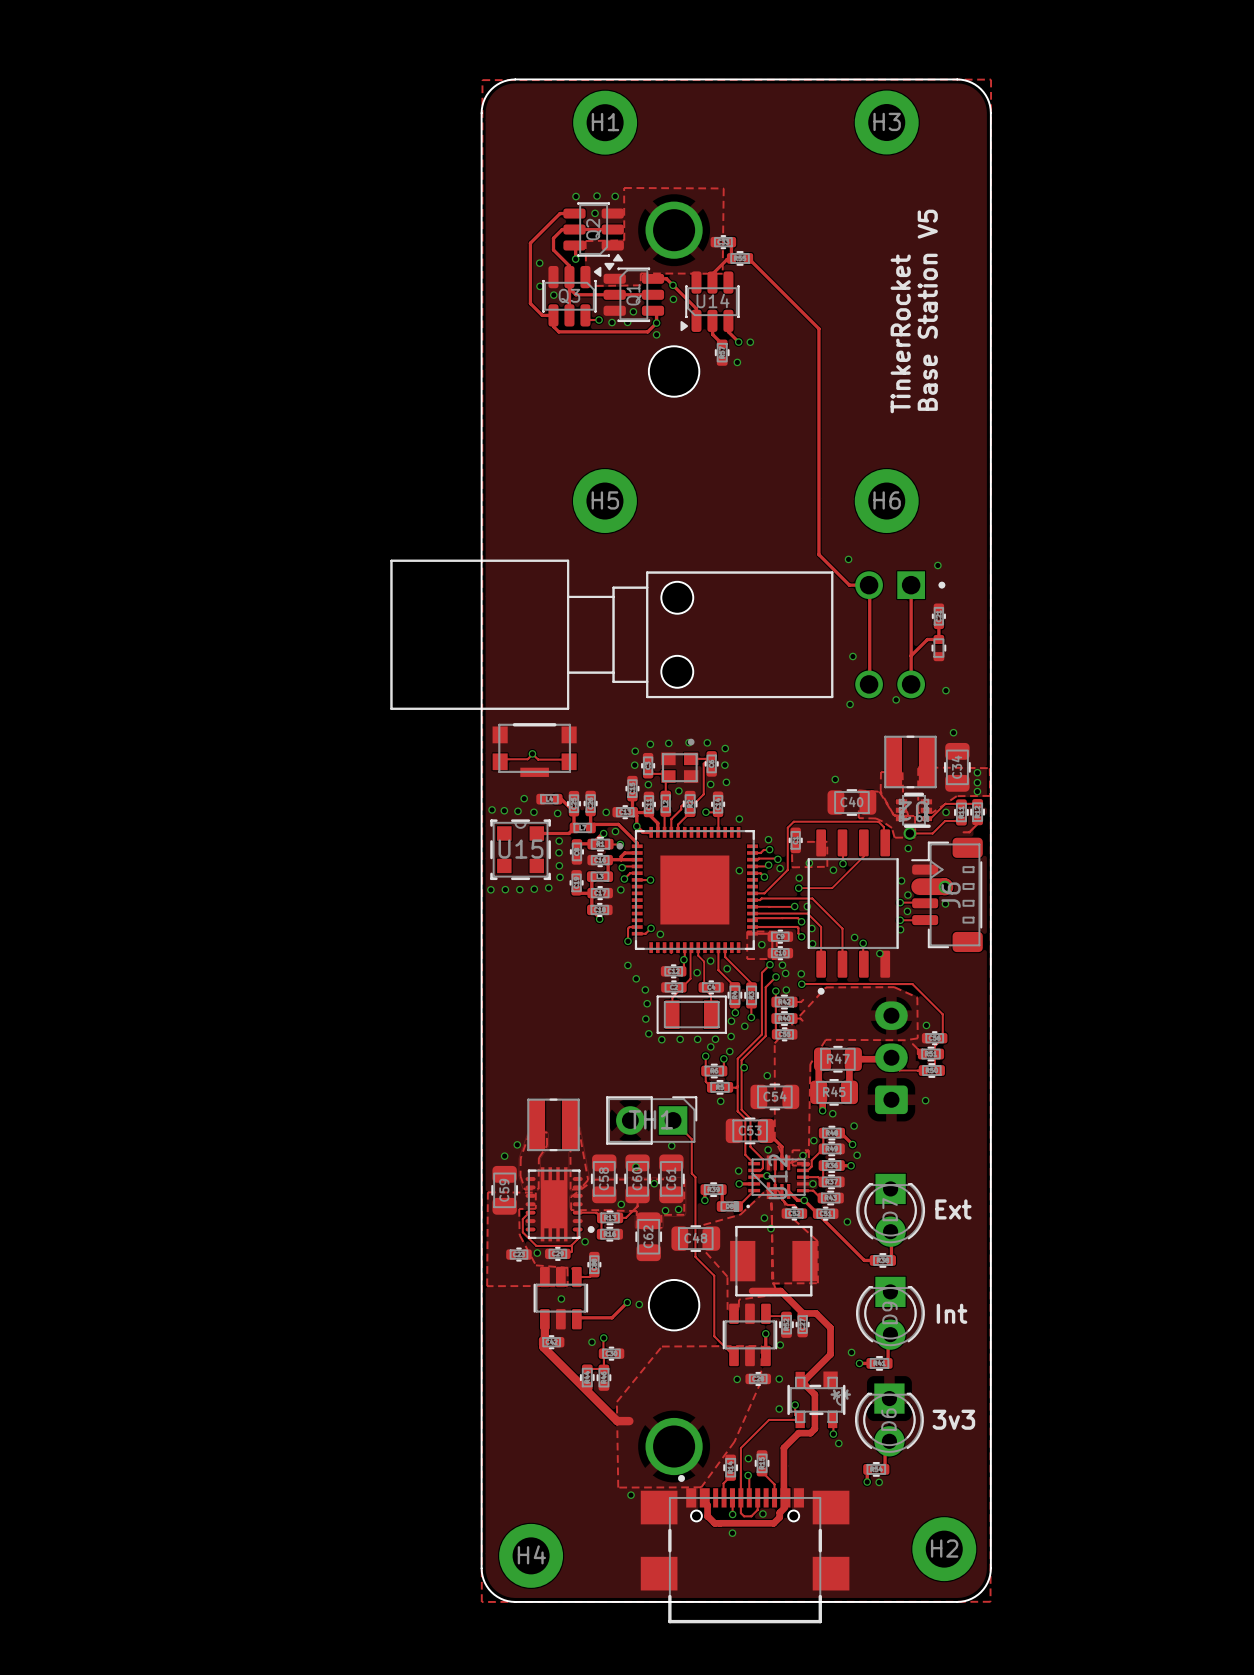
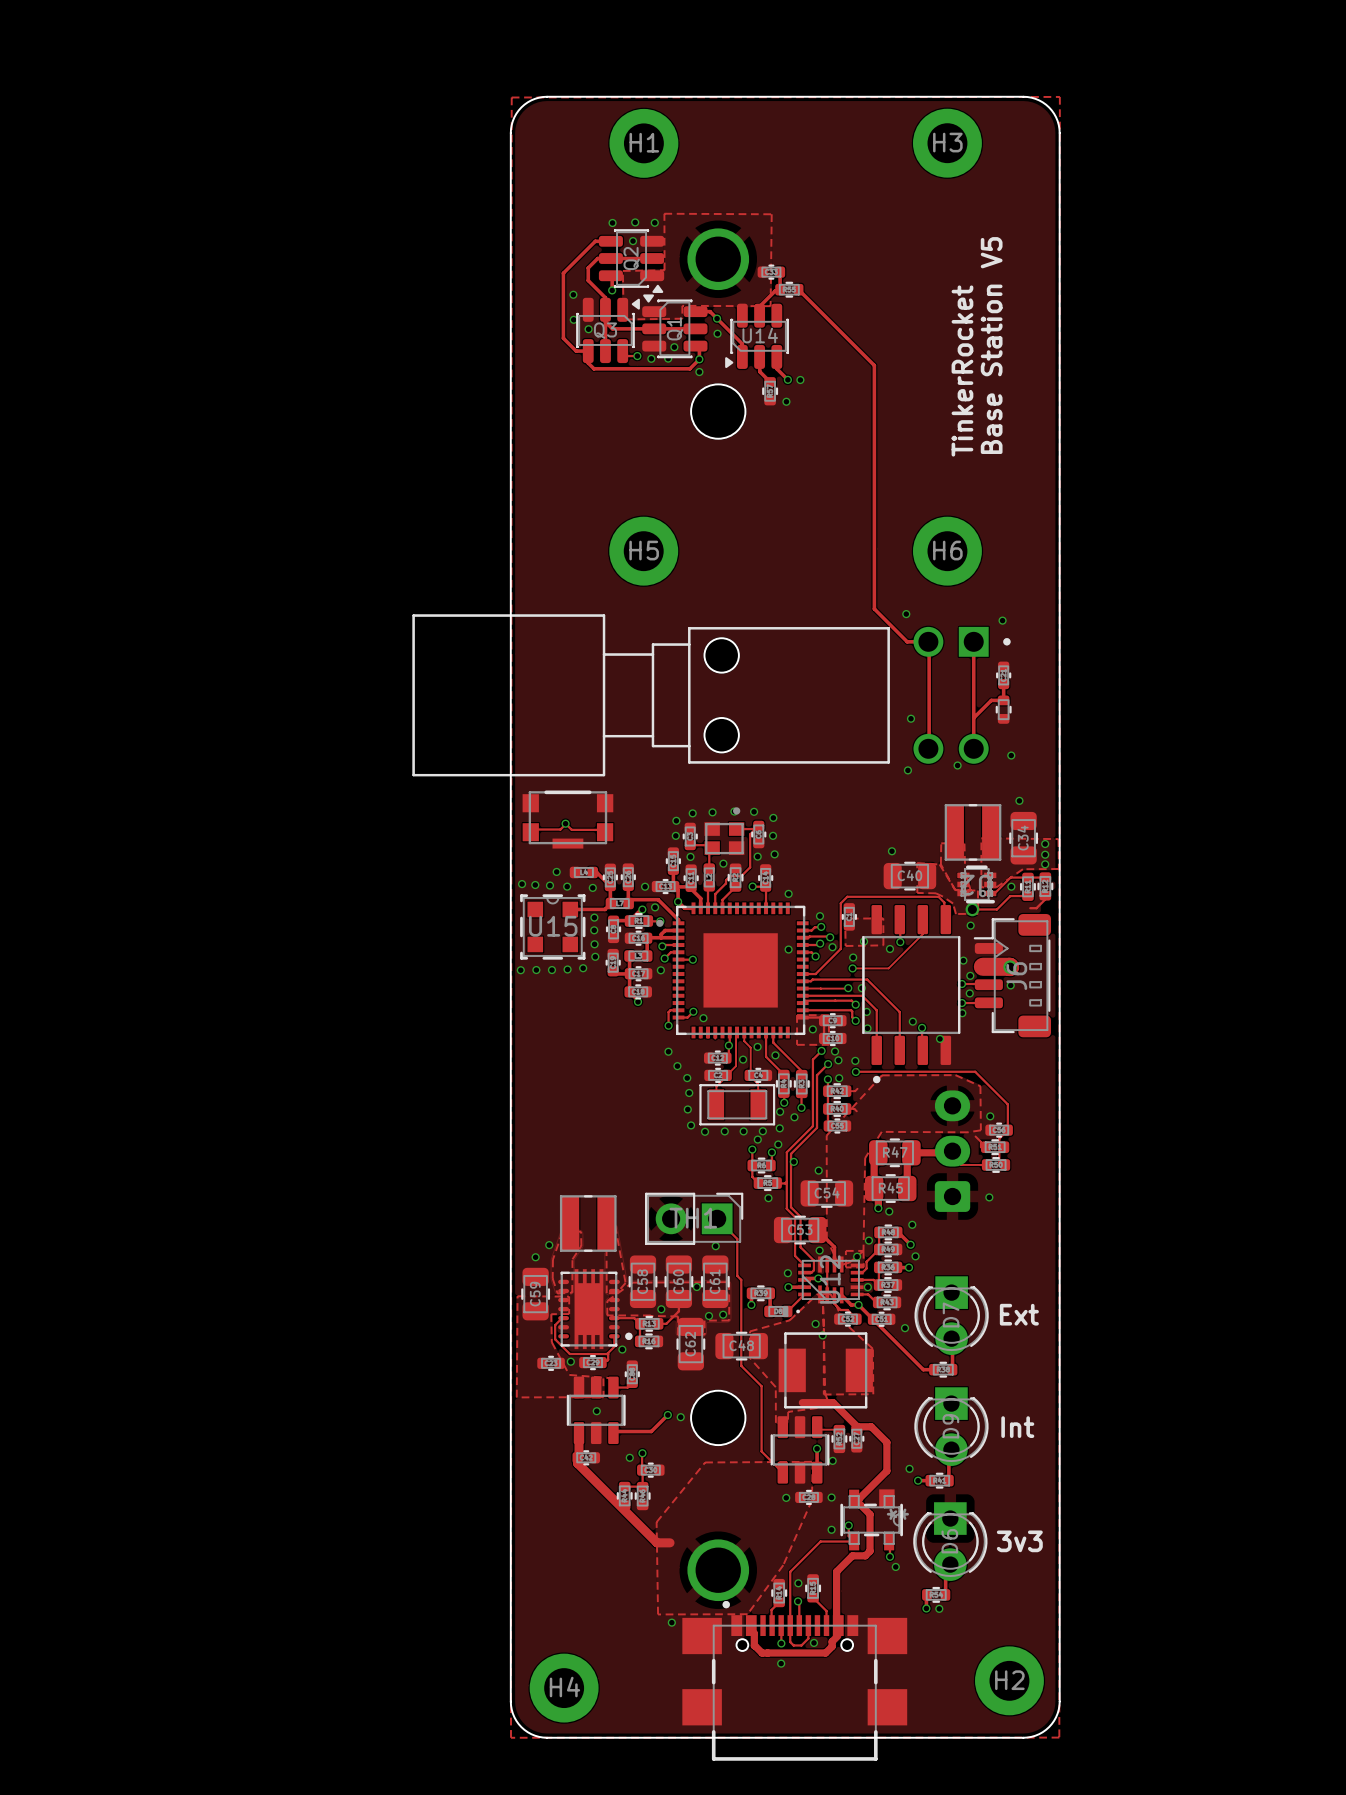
via: (635, 1166) -> none

